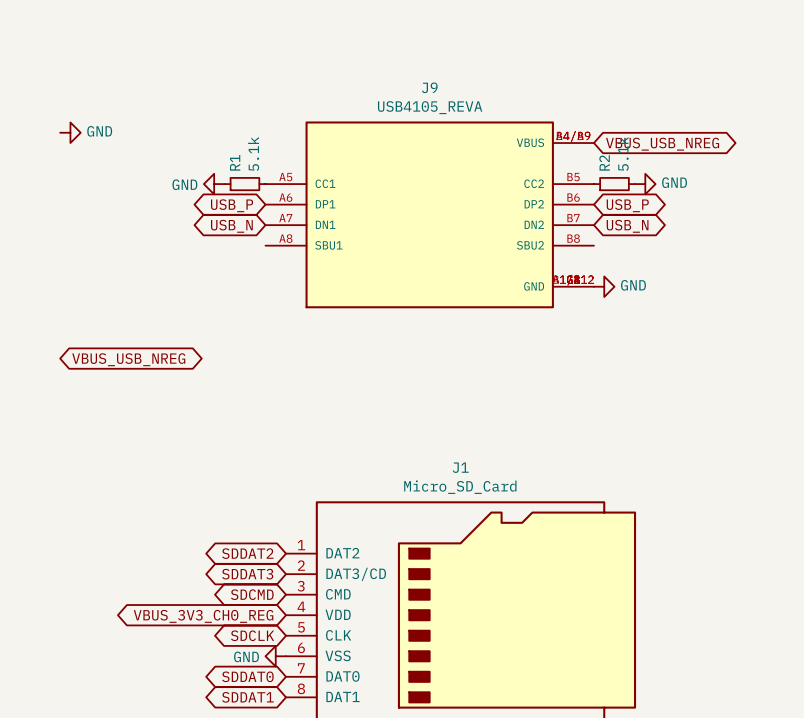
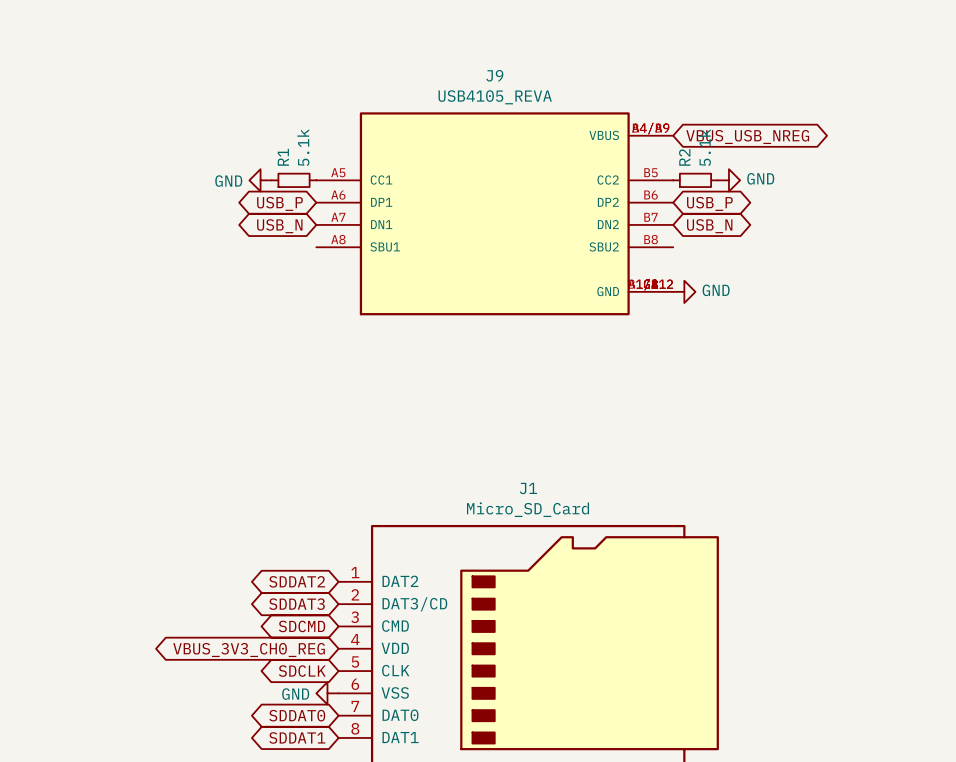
power symbol: GND (70, 132) -> none
global label: VBUS_USB_NREG (128, 359) -> none

